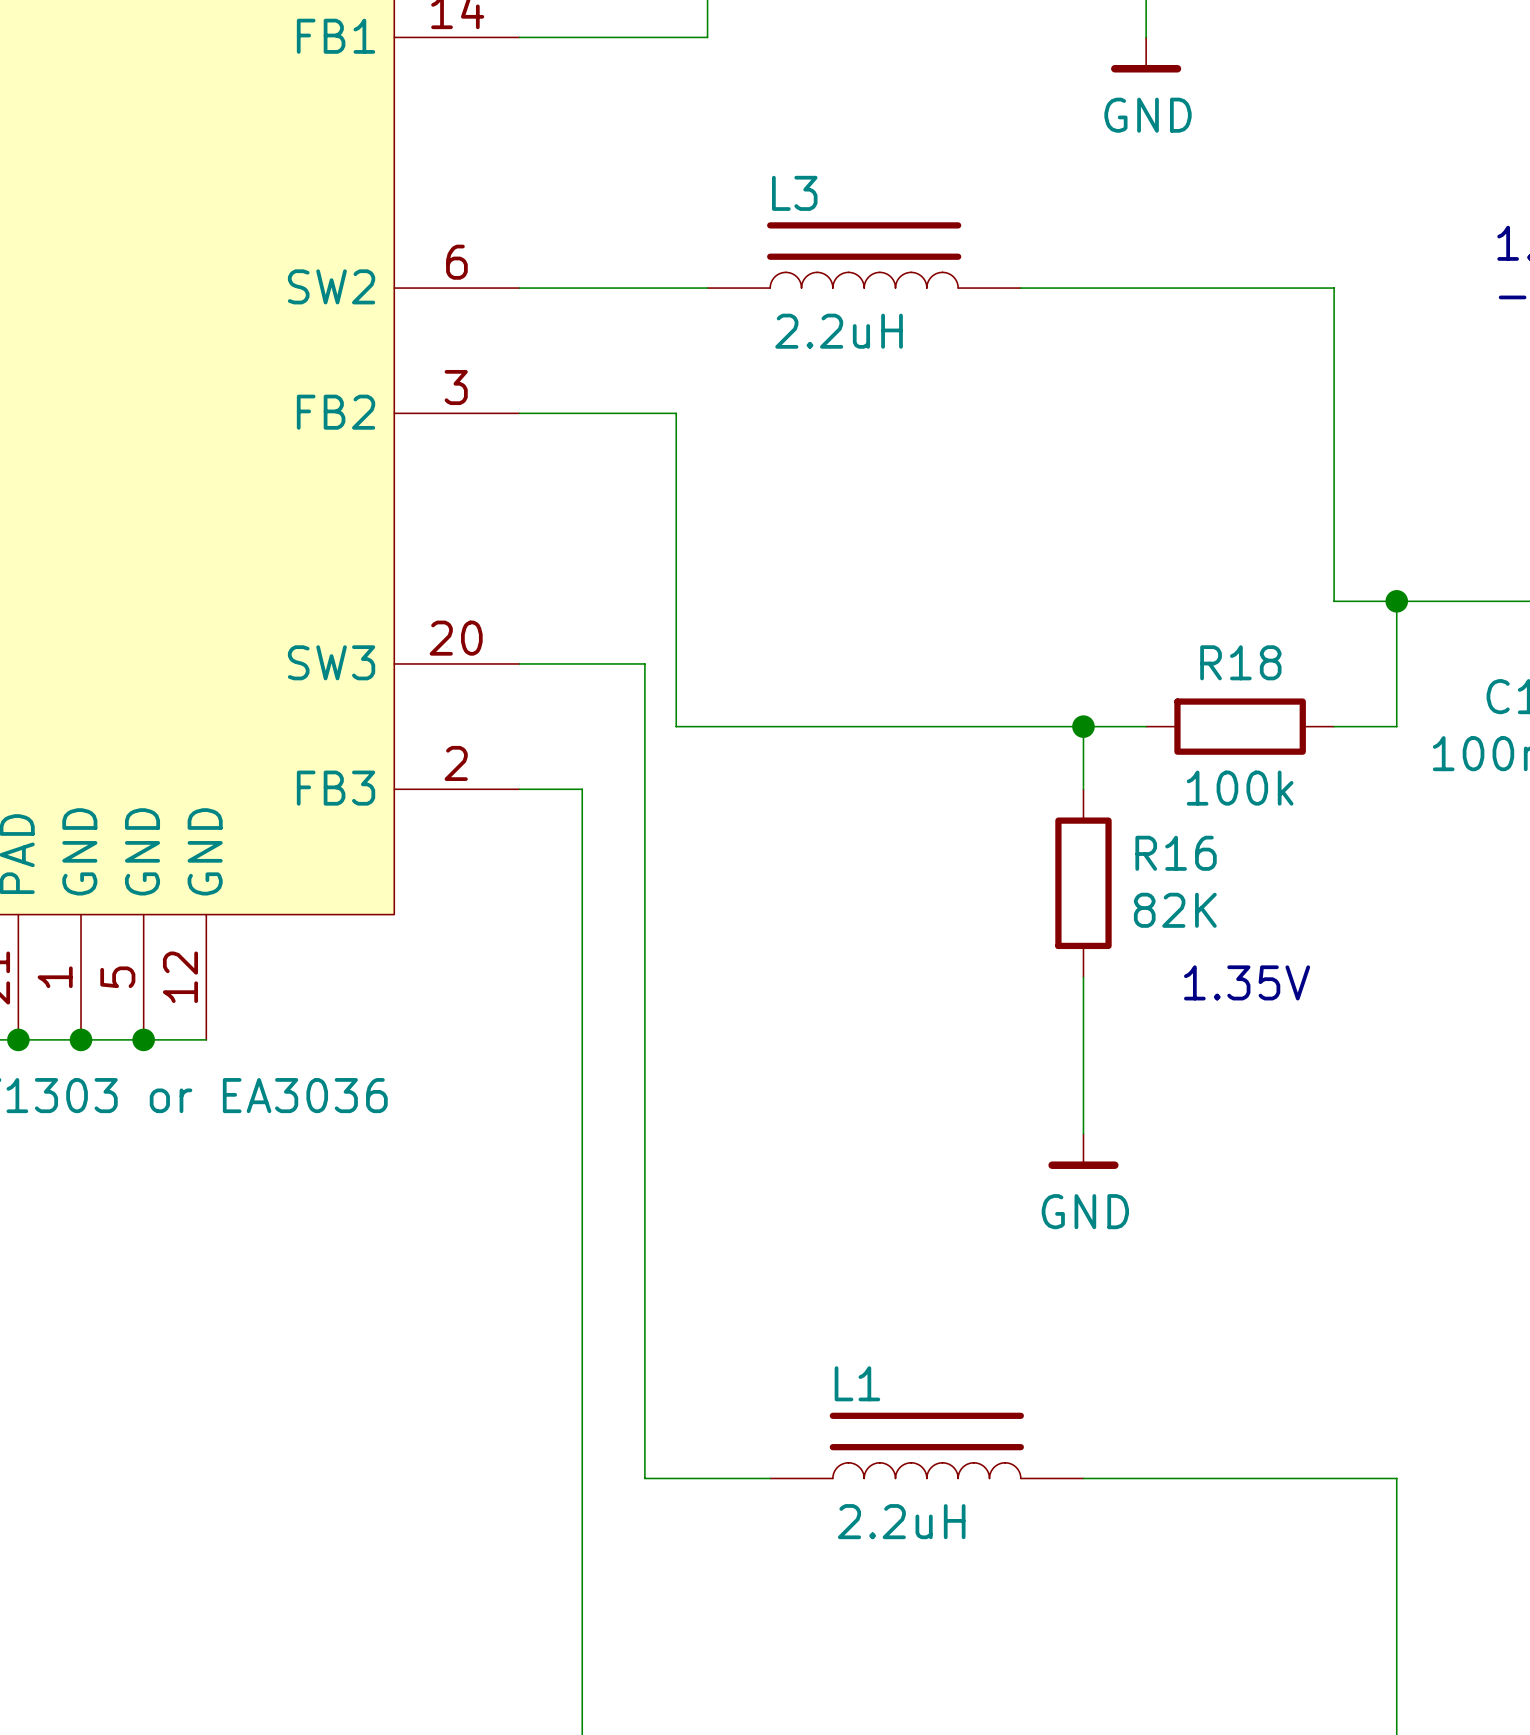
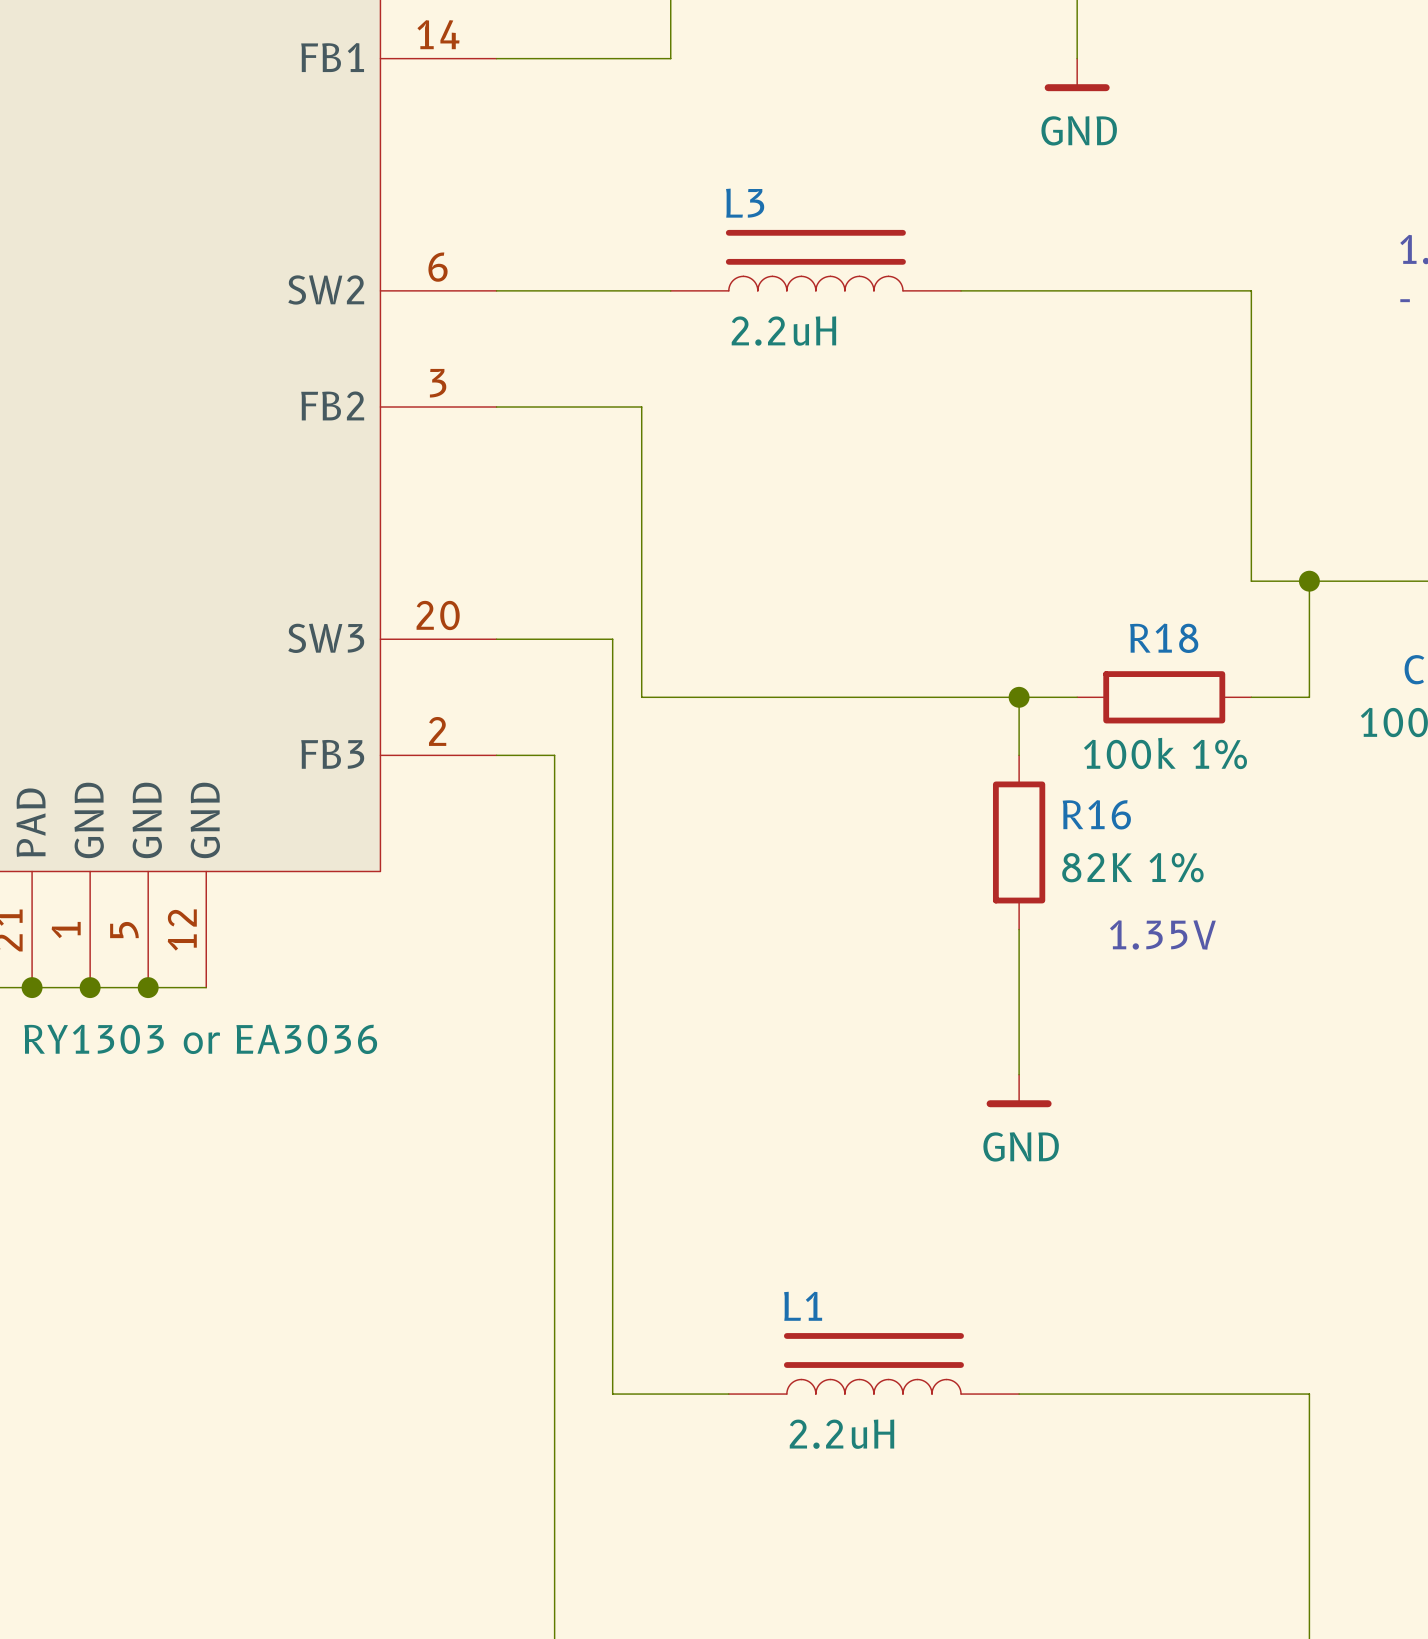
R18 value: 100k (1240, 788) -> 100k 1% (1165, 753)
R16 value: 82K (1175, 910) -> 82K 1% (1132, 867)

